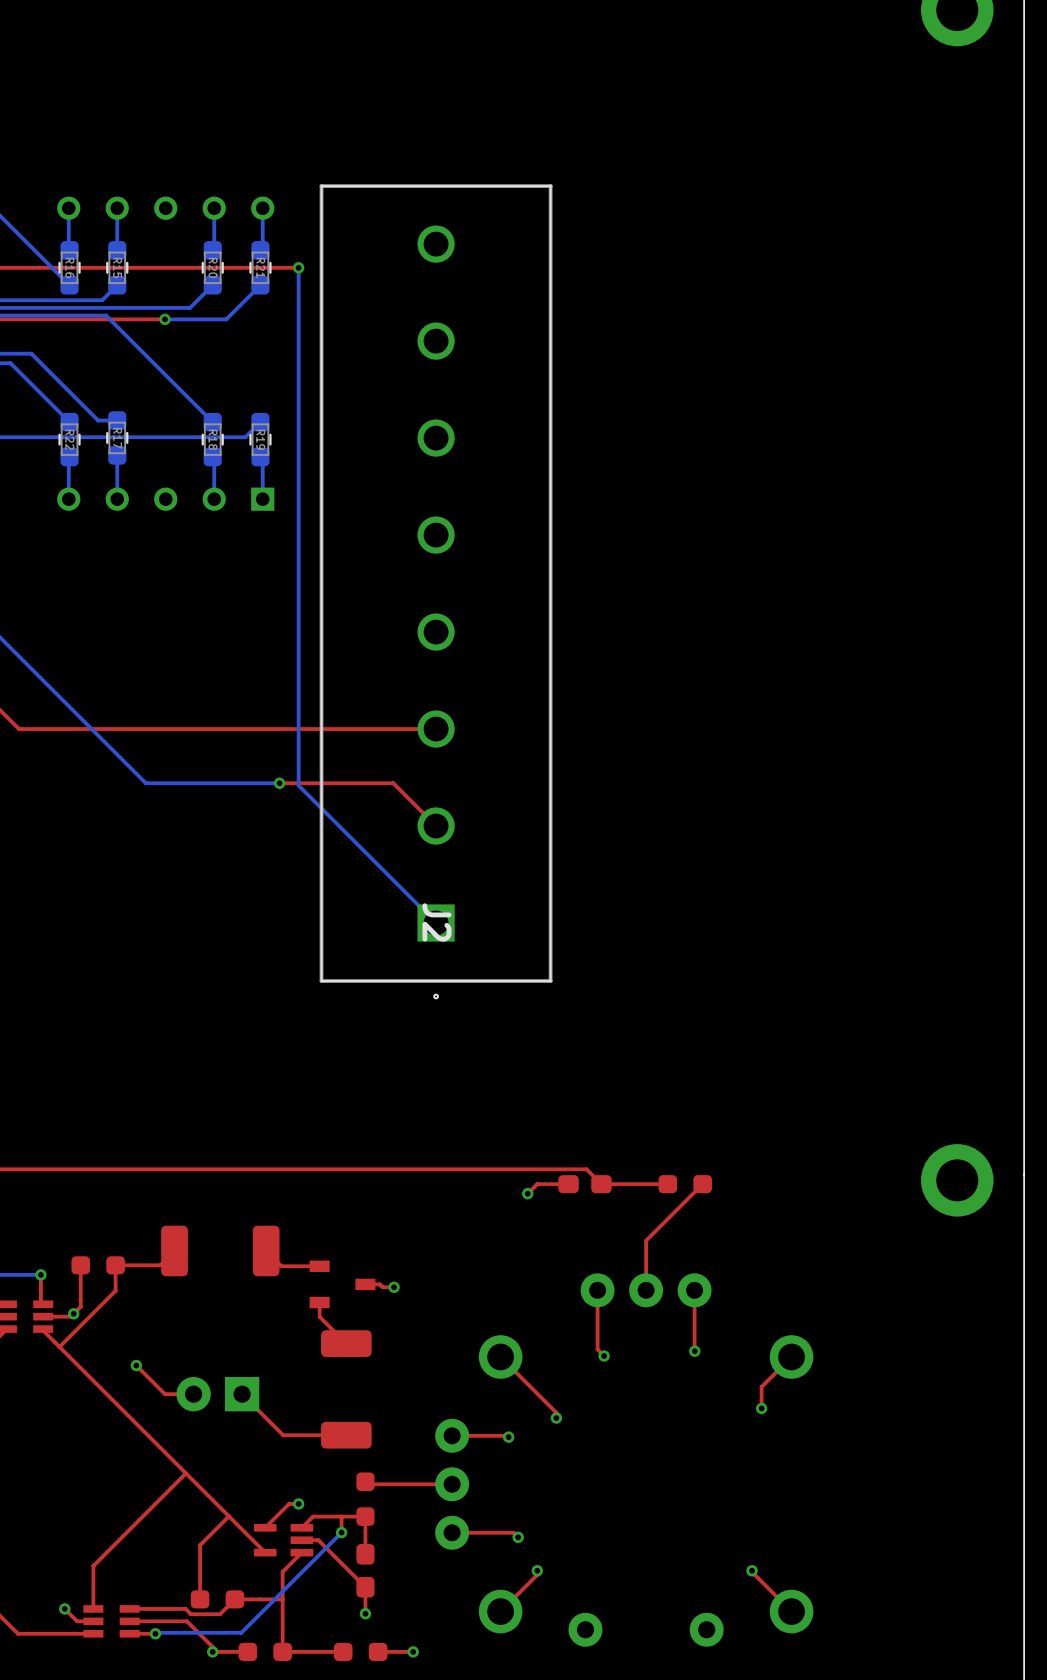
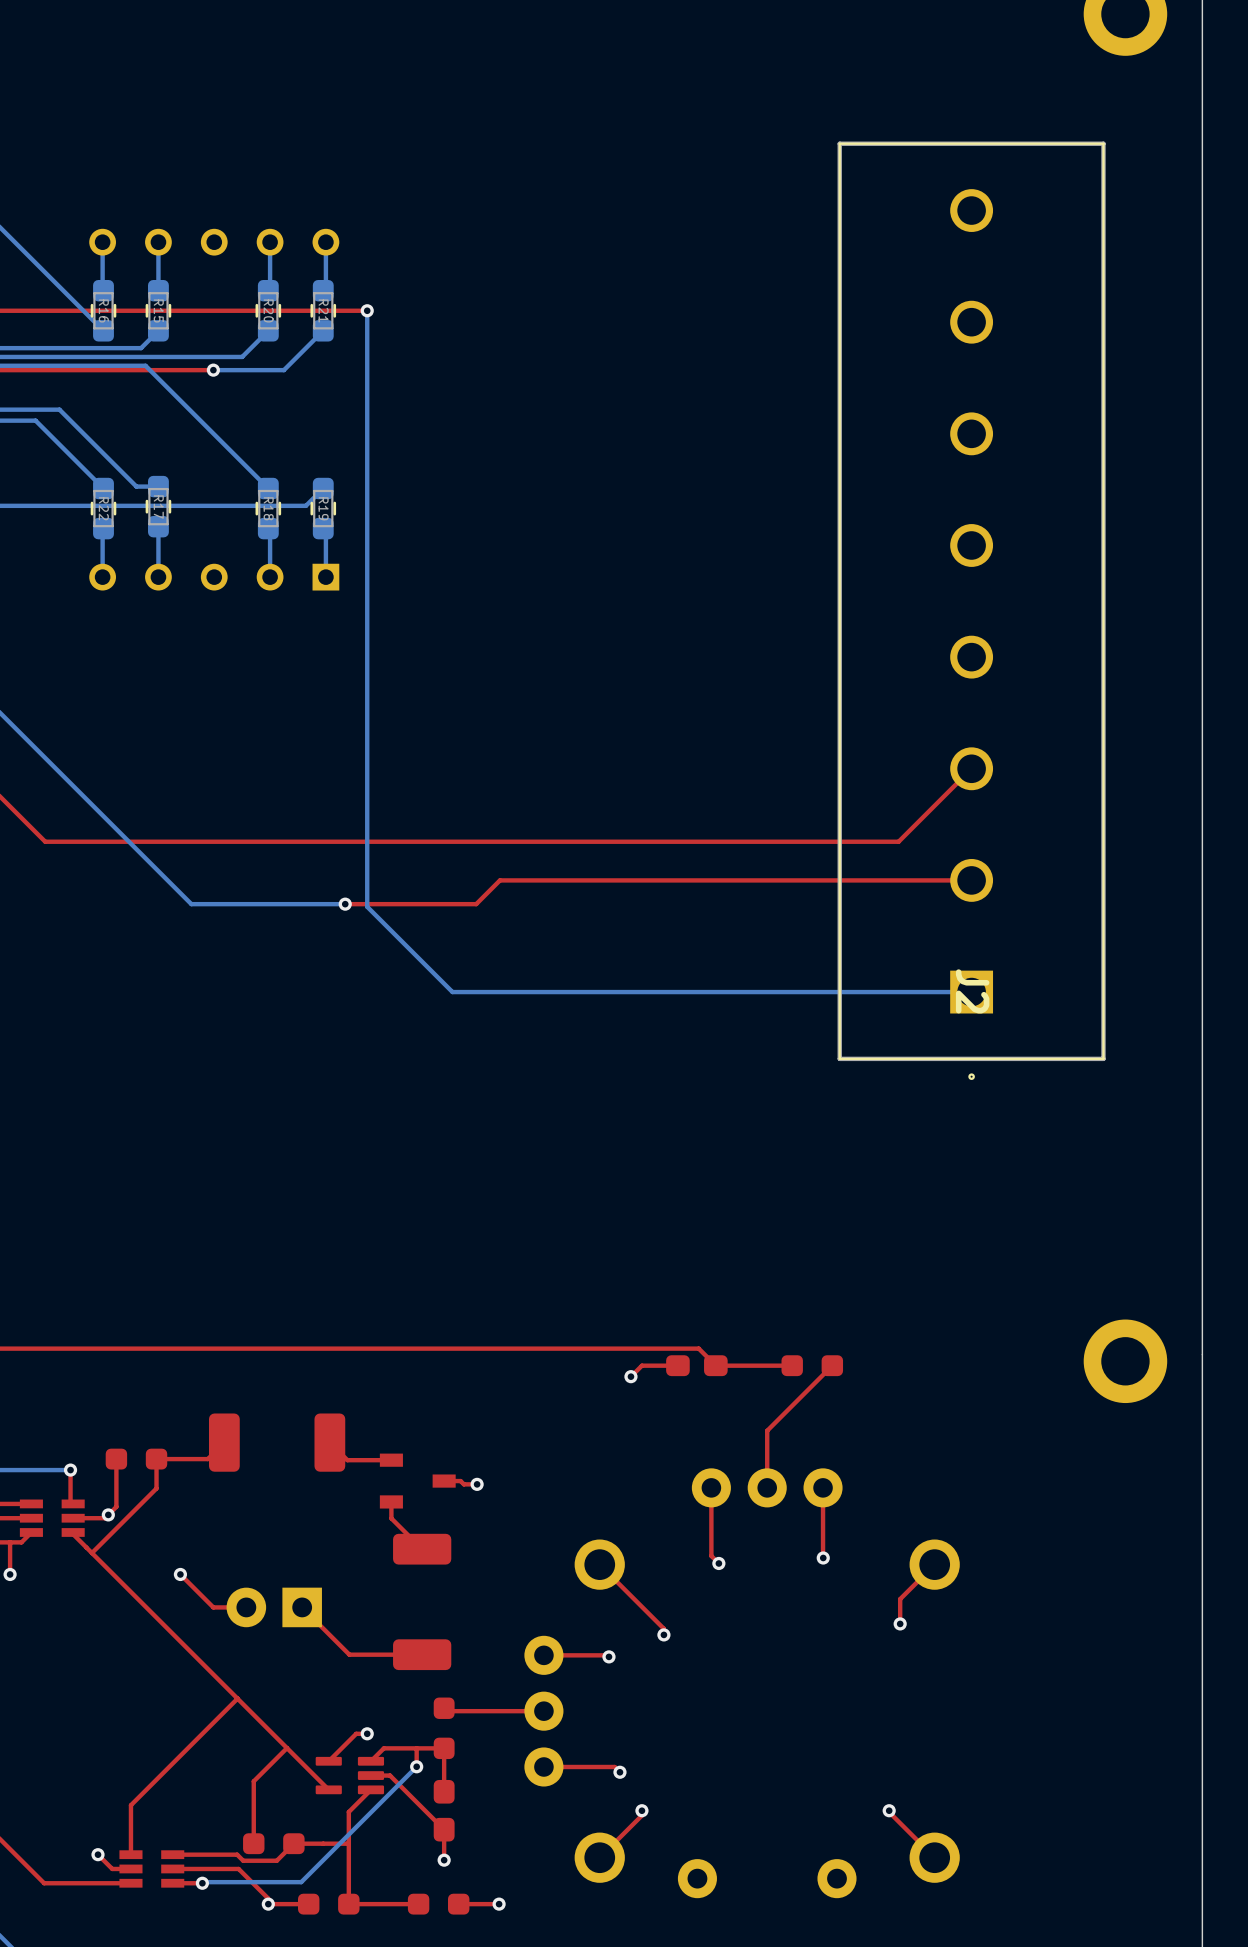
J2 position: (436, 591) -> (971, 610)
top track: none -> (971, 768) (898, 841) (525, 841)
top track: (393, 783) (436, 826) -> (476, 904) (499, 880) (971, 880)
bottom track: (372, 859) (436, 923) -> (452, 992) (971, 992)

